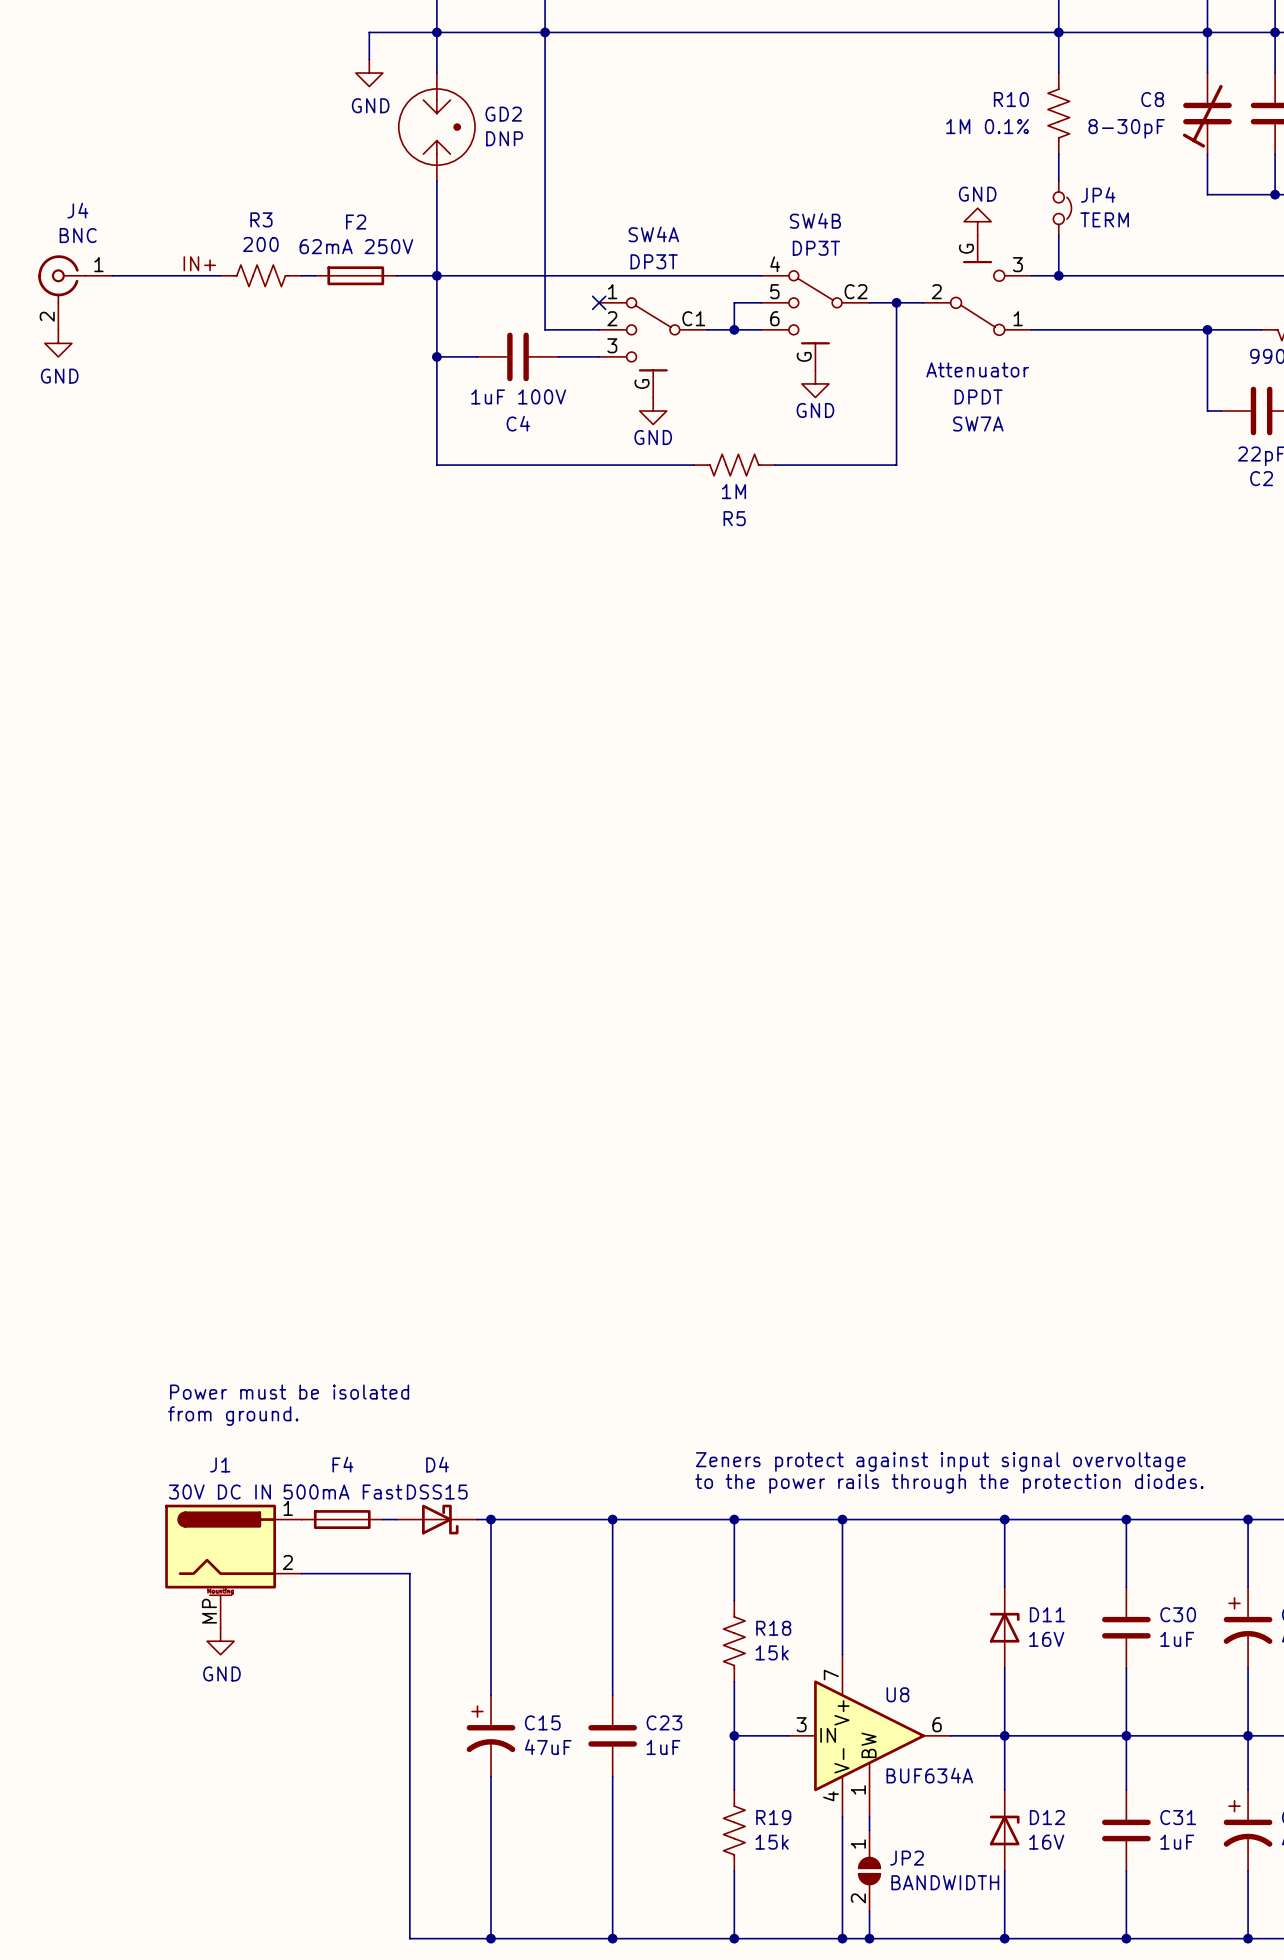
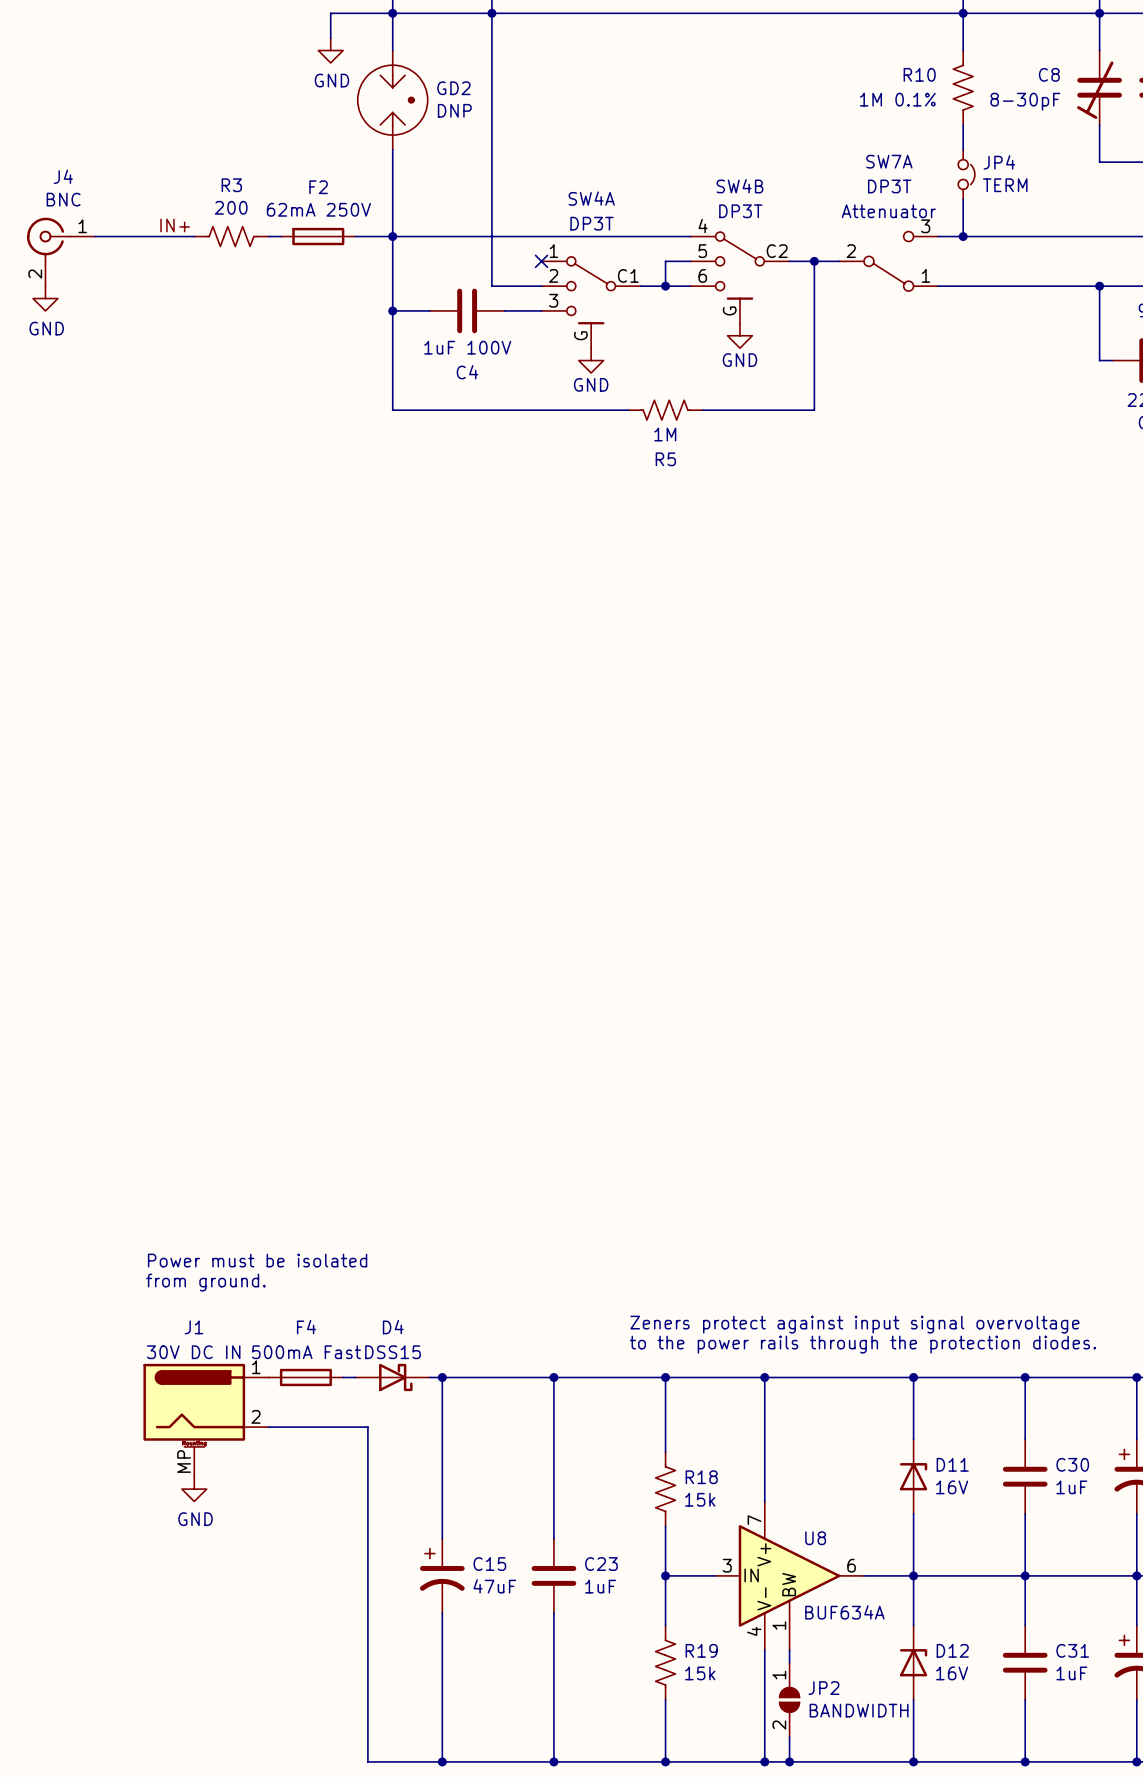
power symbol: GND (977, 221) -> none
SW7A symbol: [923, 235, 1032, 336] -> [839, 231, 939, 292]
SW7A text position: Attenuator (977, 369) -> Attenuator (888, 211)
SW7A value: DPDT (978, 396) -> DP3T (889, 186)
SW7A name position: SW7A (978, 424) -> SW7A (889, 161)

